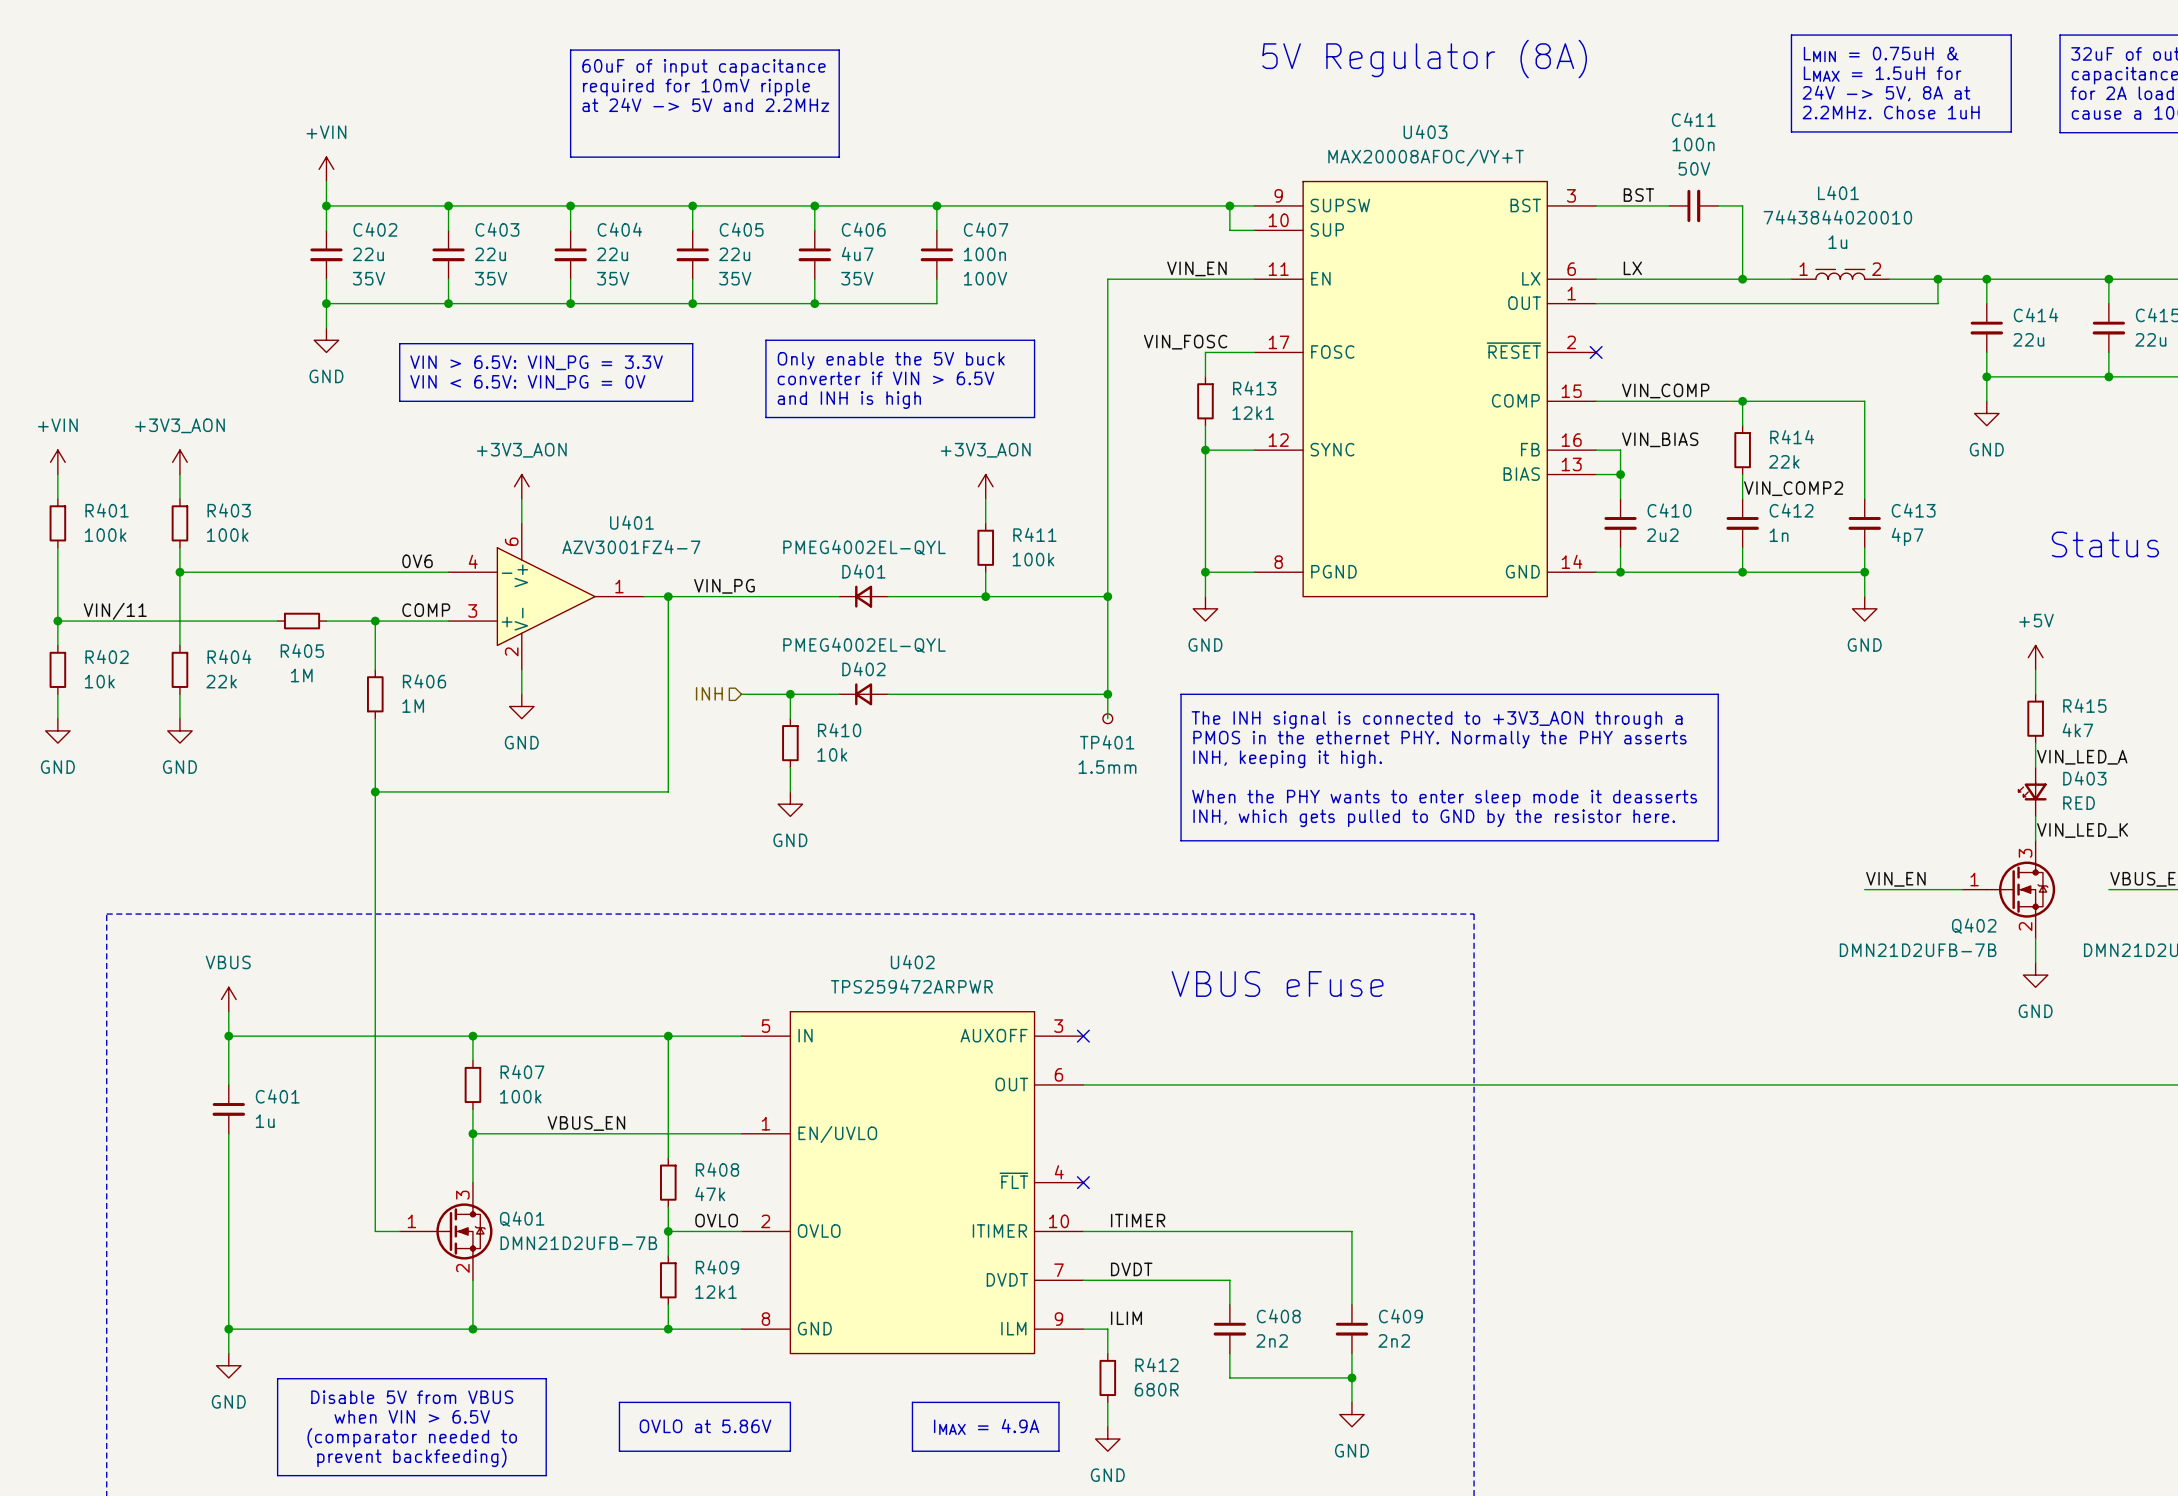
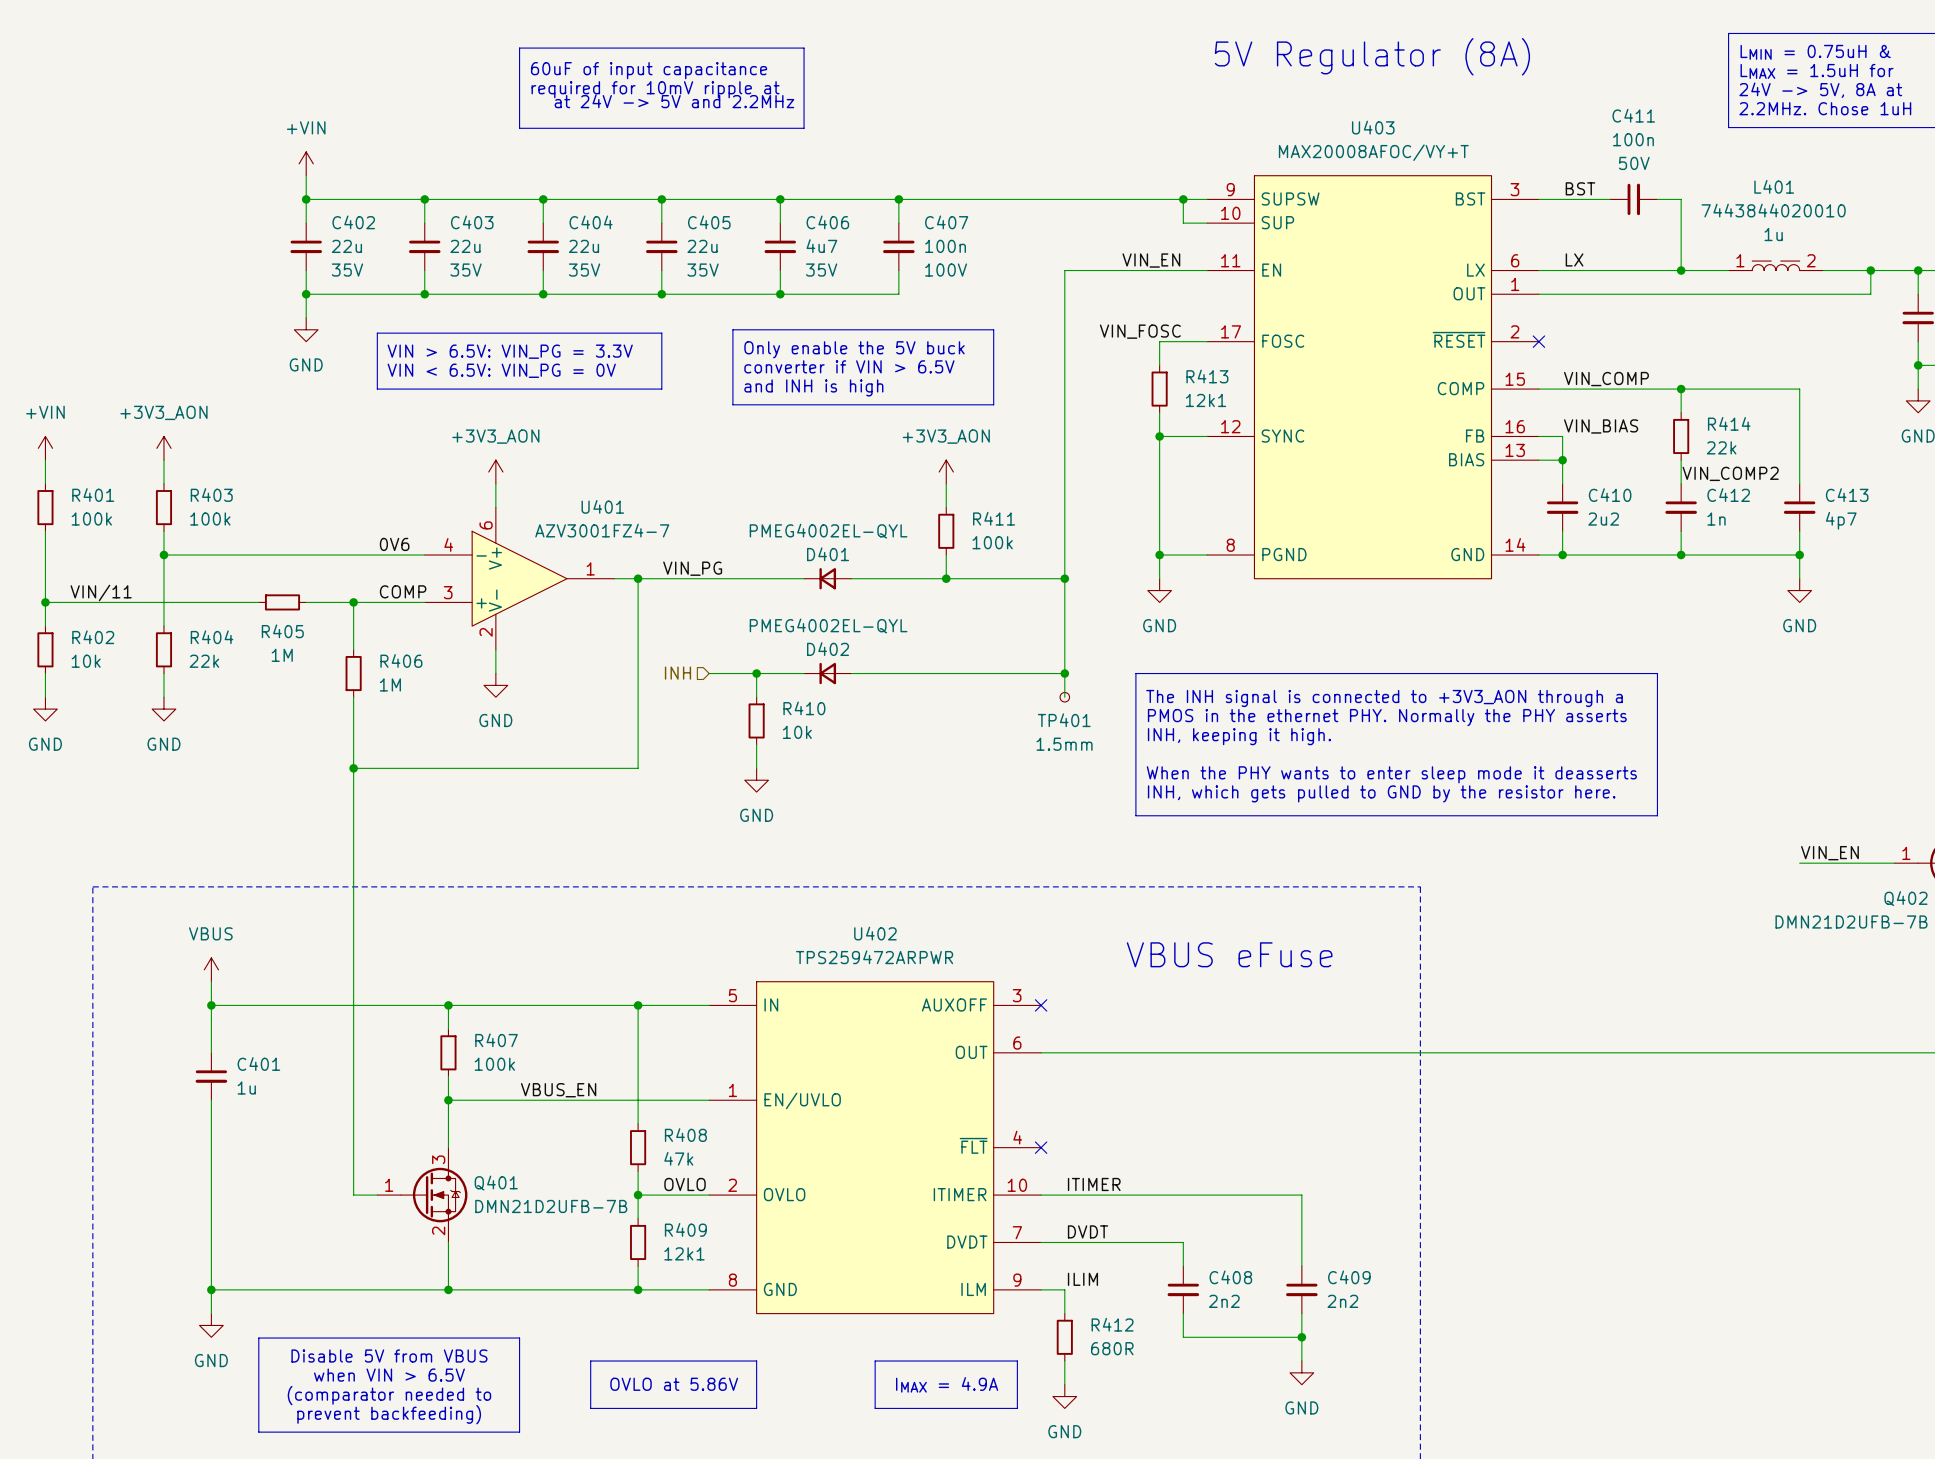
line: (570, 50) (570, 157) (839, 157) (839, 132) -> (543, 48) (519, 48) (519, 128) (804, 128)
text position: 60uF of input capacitance (703, 67) -> 60uF of input capacitance (649, 70)
text: required for 10mV ripple (696, 87) -> required for 10mV ripple at (655, 89)

